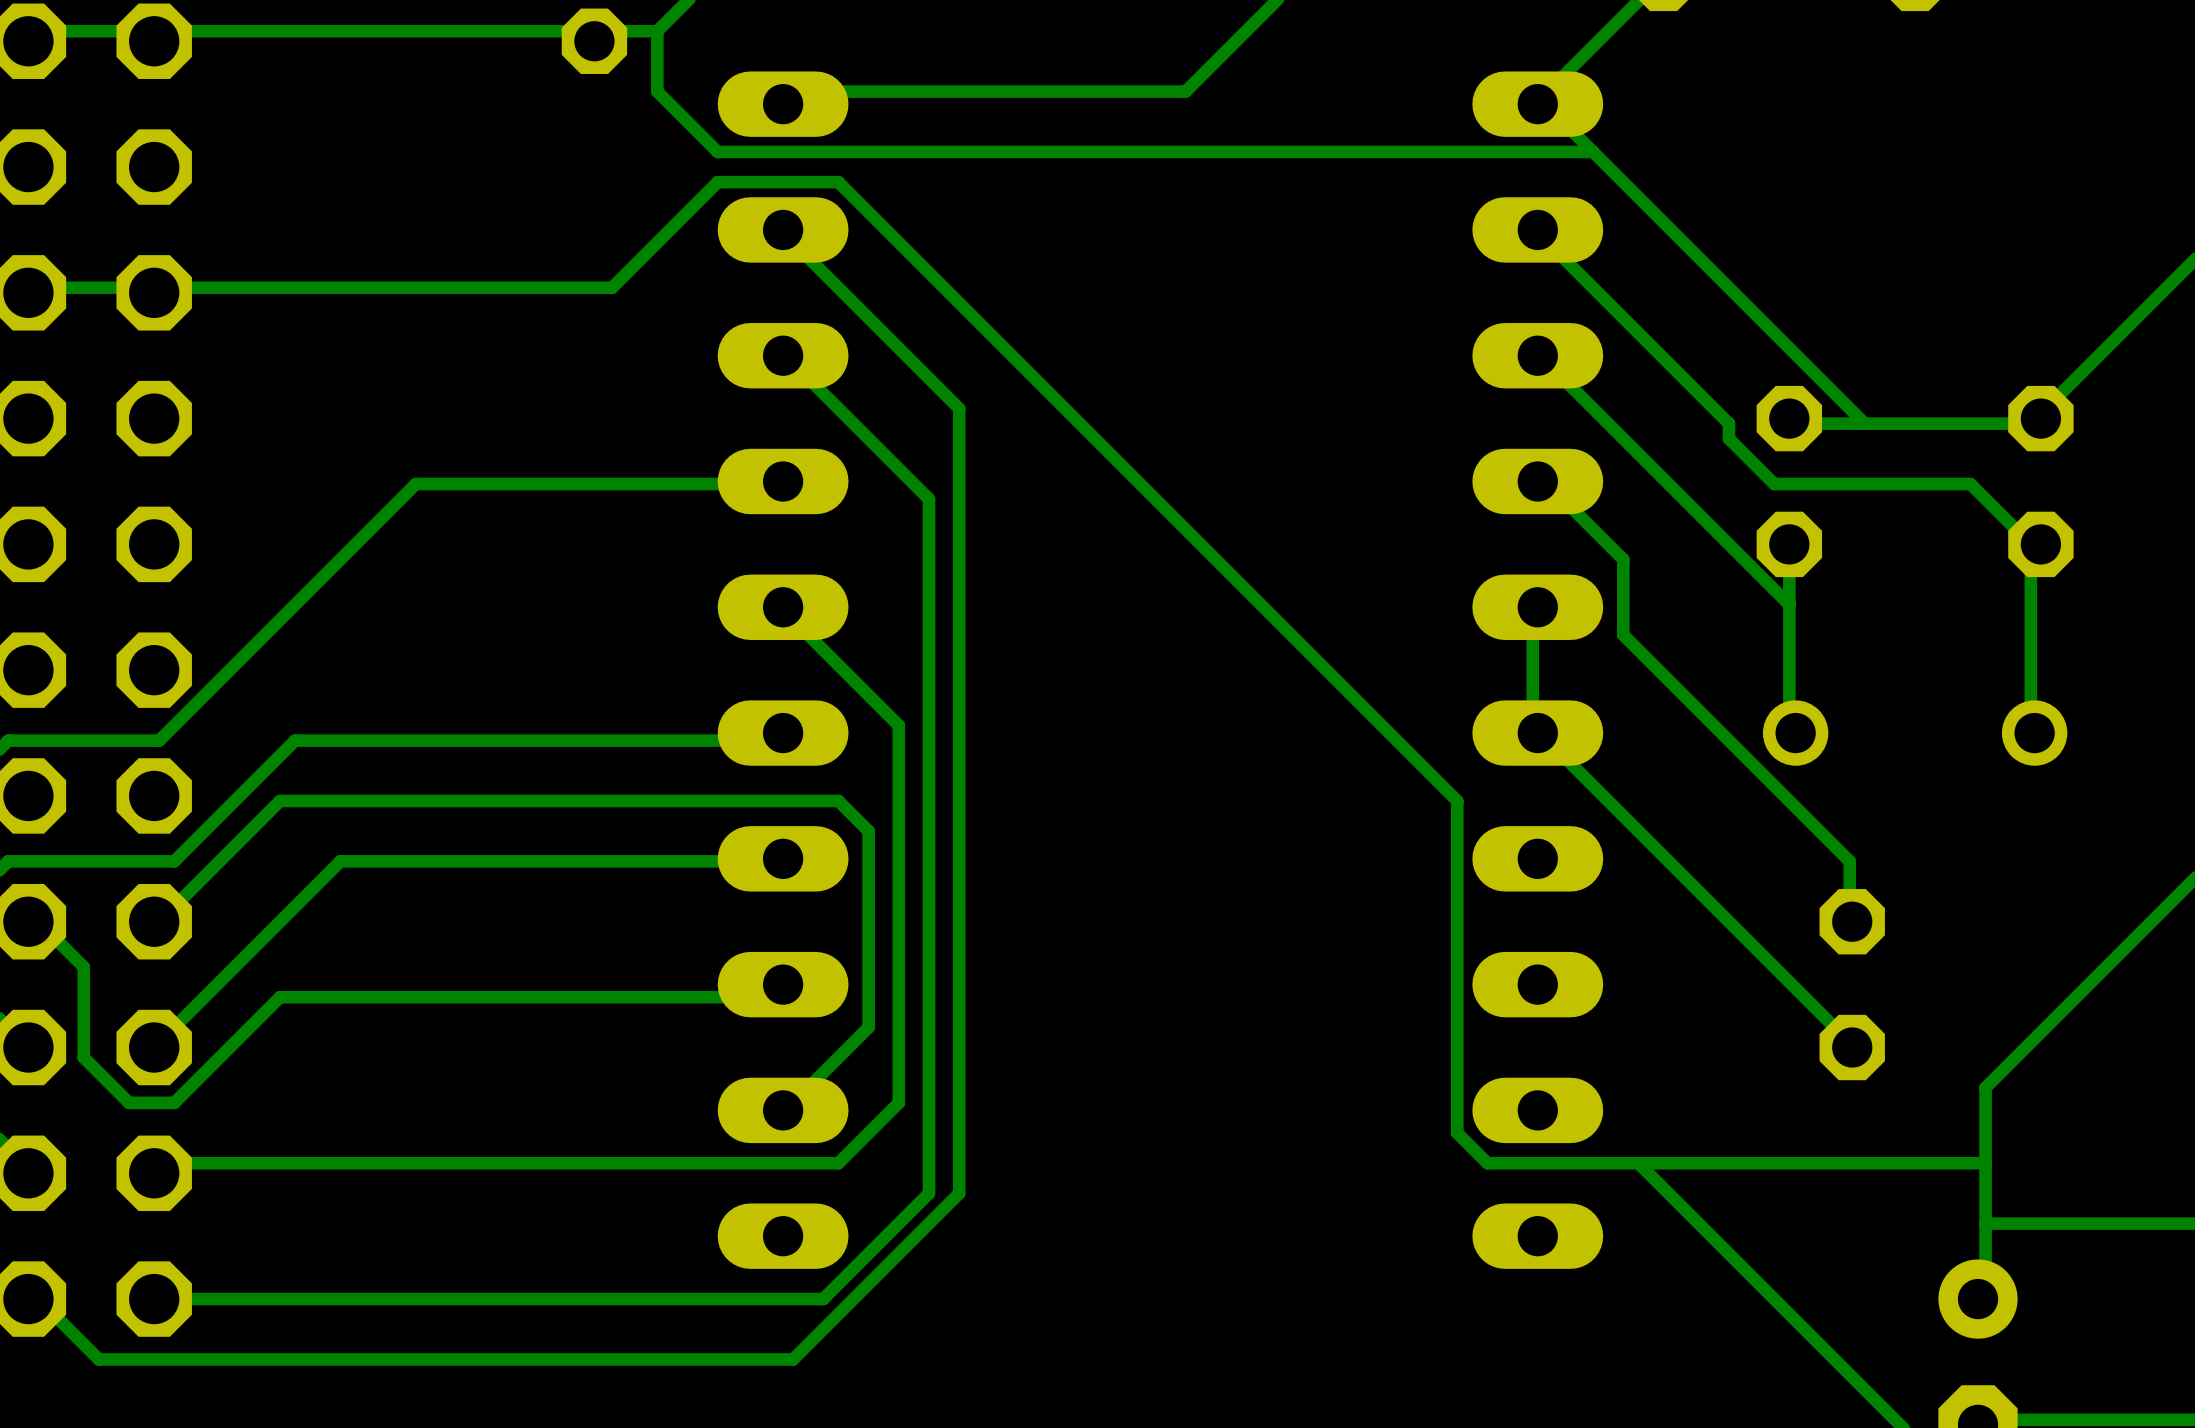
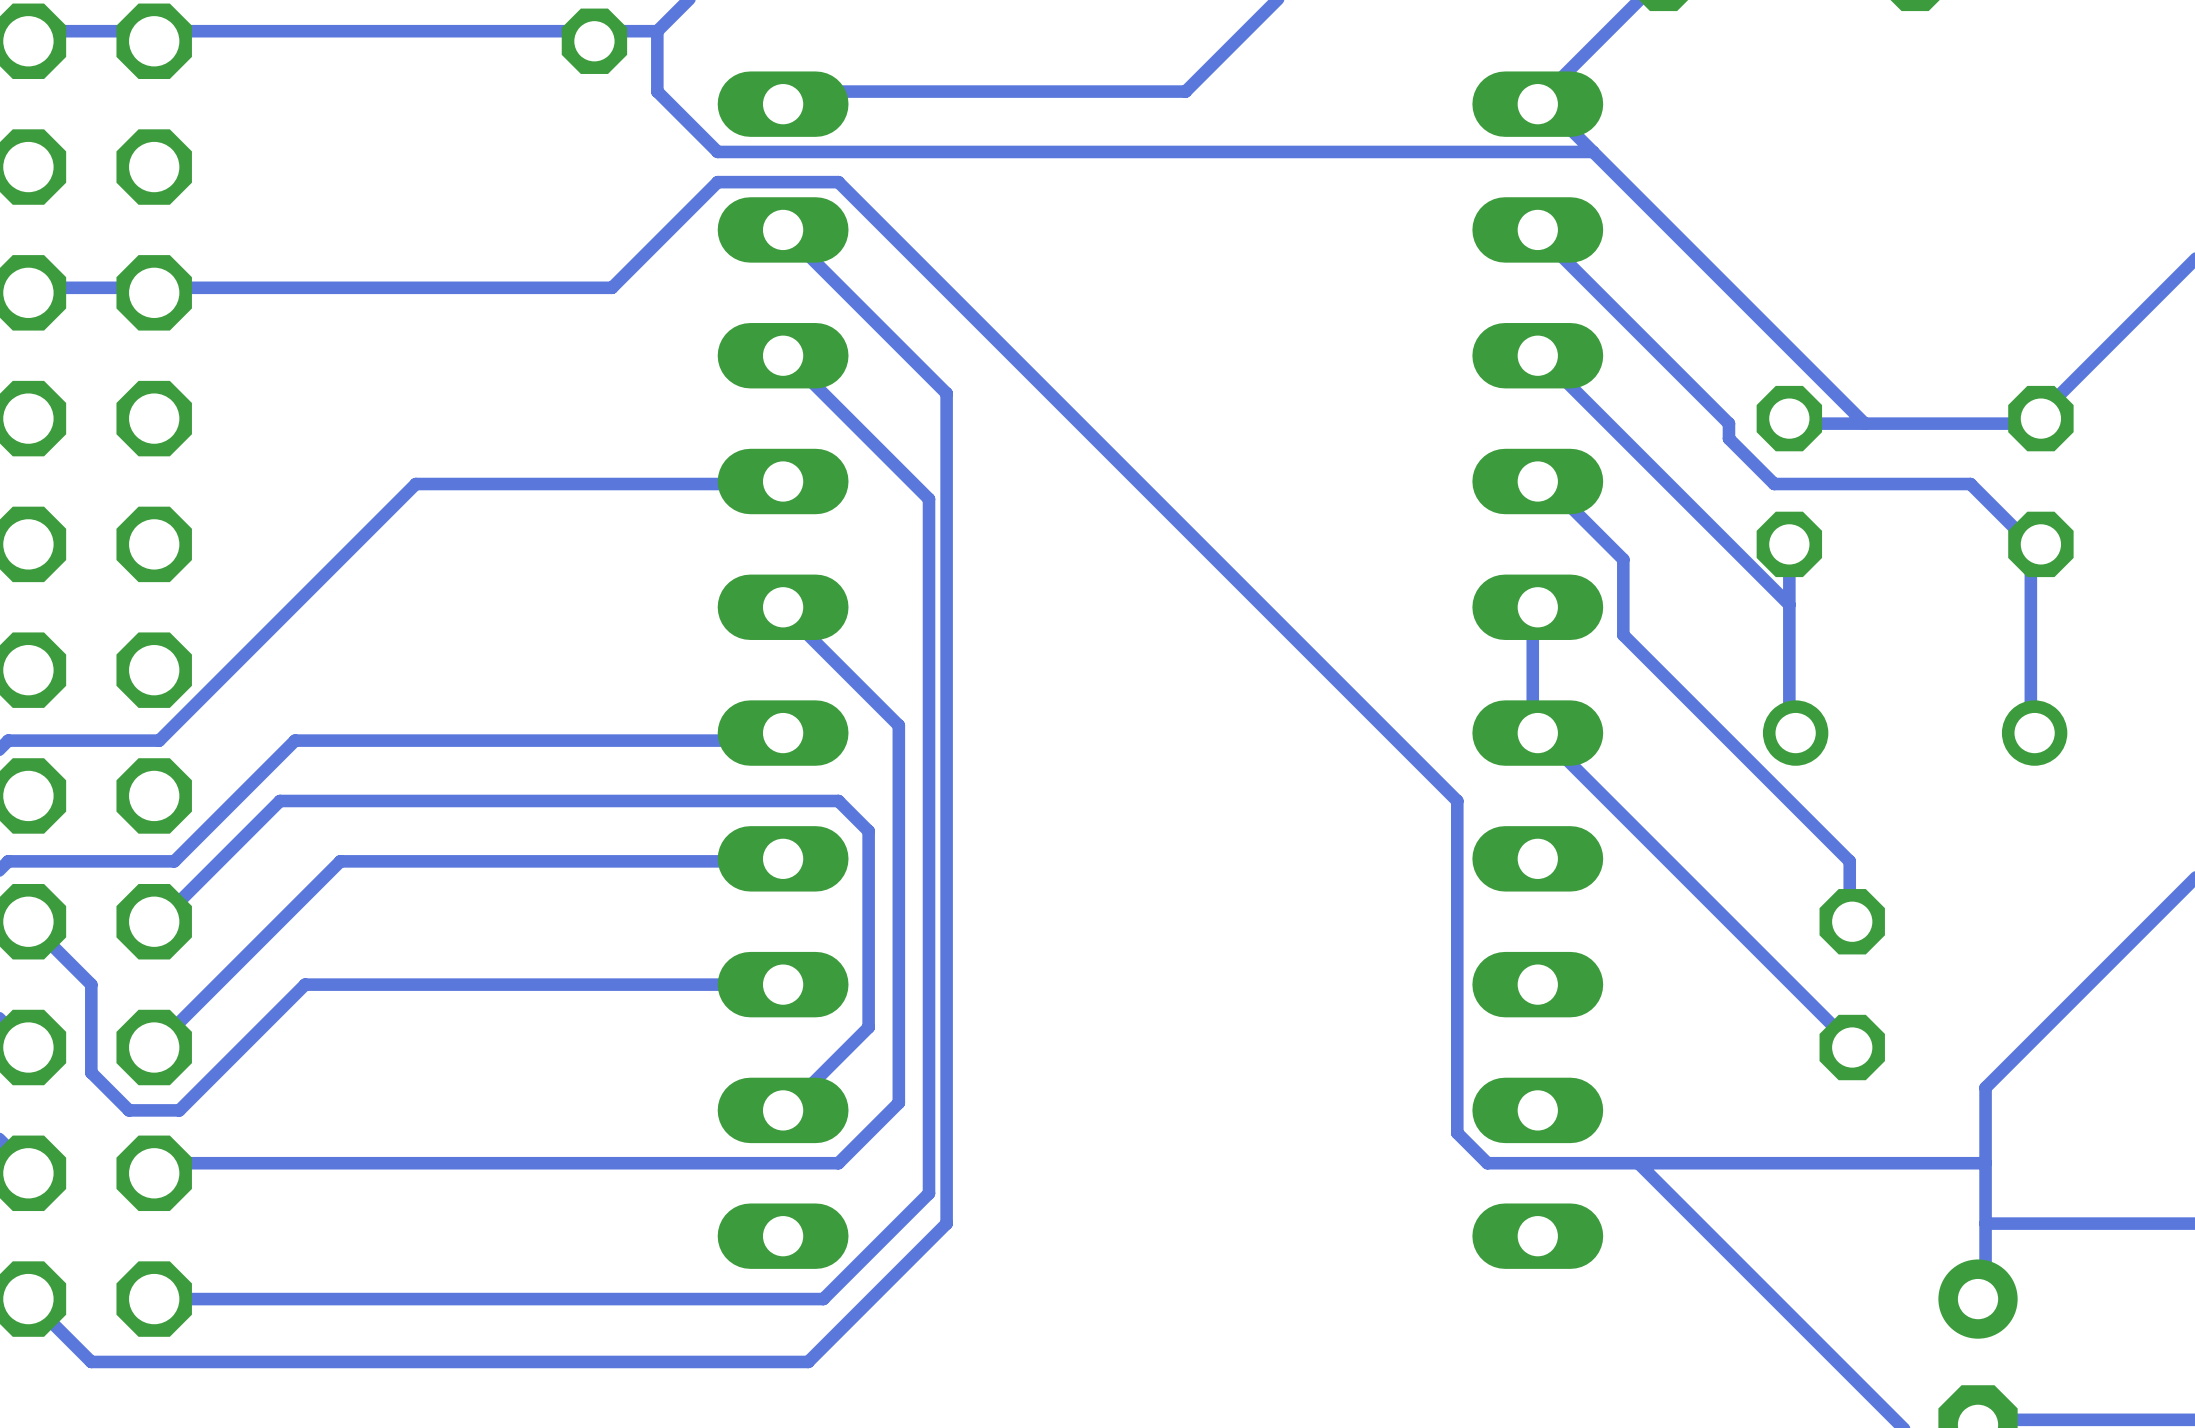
bottom track: (783, 229) (793, 242) (959, 408) (959, 1193) (793, 1359) (98, 1359) (38, 1299) (28, 1299) -> (783, 229) (946, 393) (946, 1223) (808, 1361) (91, 1361) (28, 1299)
bottom track: (28, 921) (38, 921) (83, 967) (83, 1057) (129, 1102) (174, 1102) (279, 997) (778, 997) (783, 984) -> (28, 921) (91, 984) (91, 1072) (129, 1110) (179, 1110) (305, 984) (783, 984)

